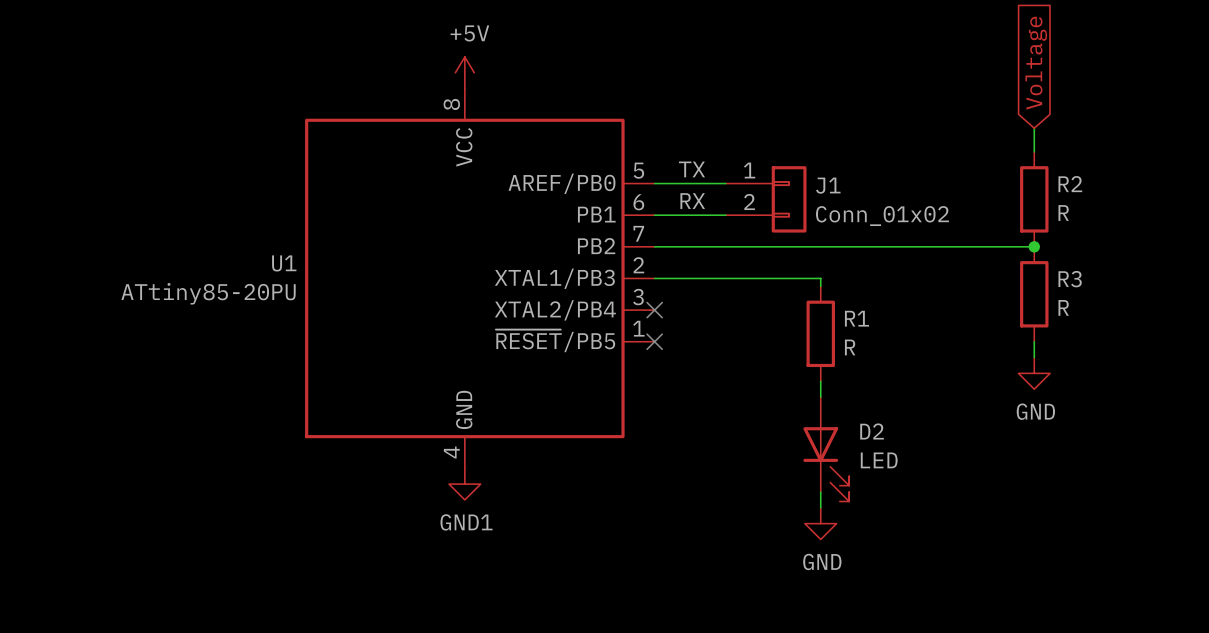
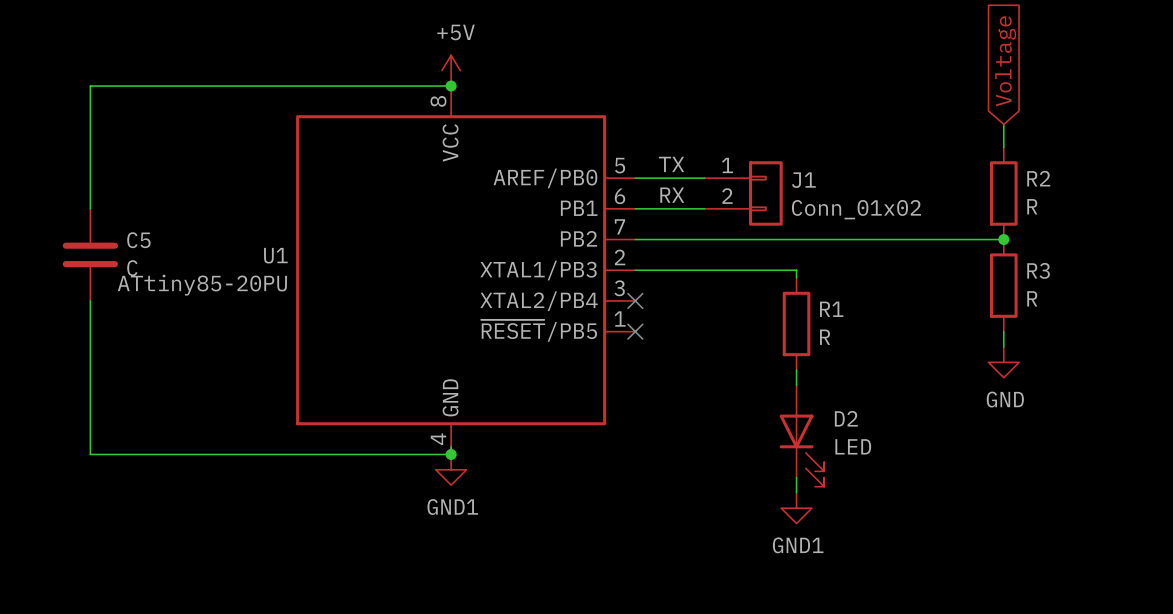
wire: none -> (451, 86) (90, 86) (90, 208)
junction: none -> (451, 86)
C5: none -> C (90, 254)
wire: none -> (90, 300) (90, 454) (451, 454) (451, 446)
junction: none -> (451, 454)
power symbol: GND (820, 523) -> GND1 (796, 508)

